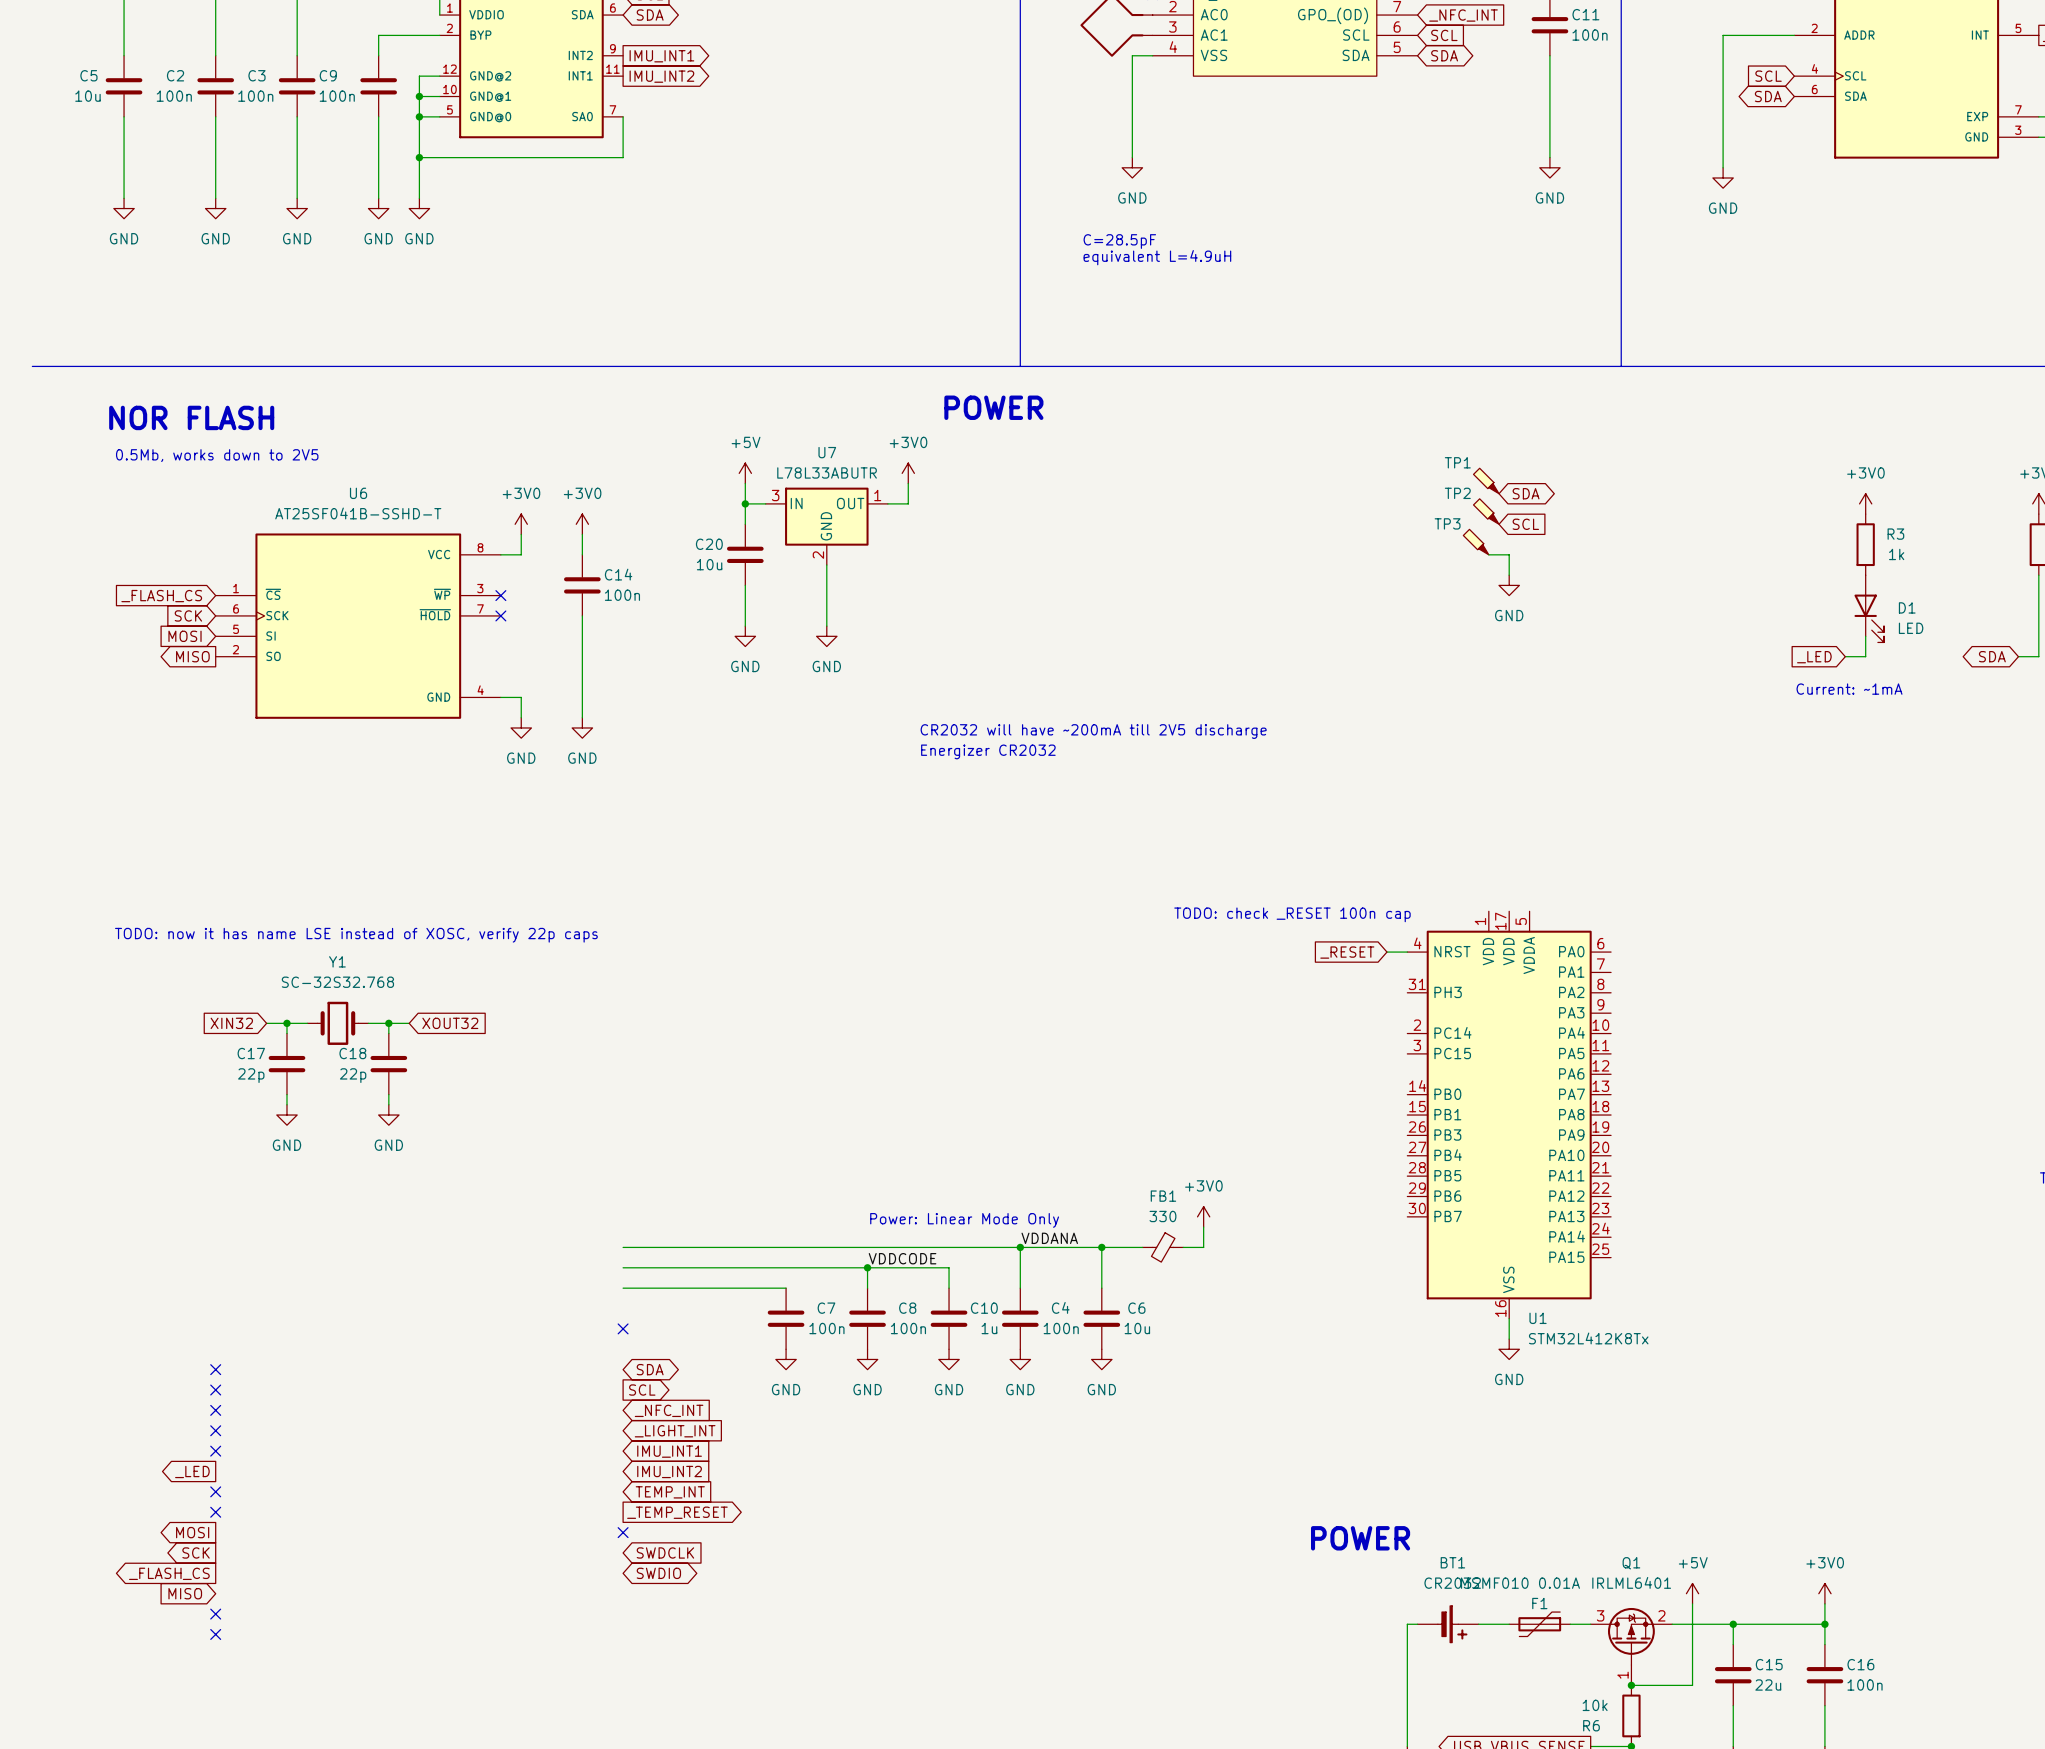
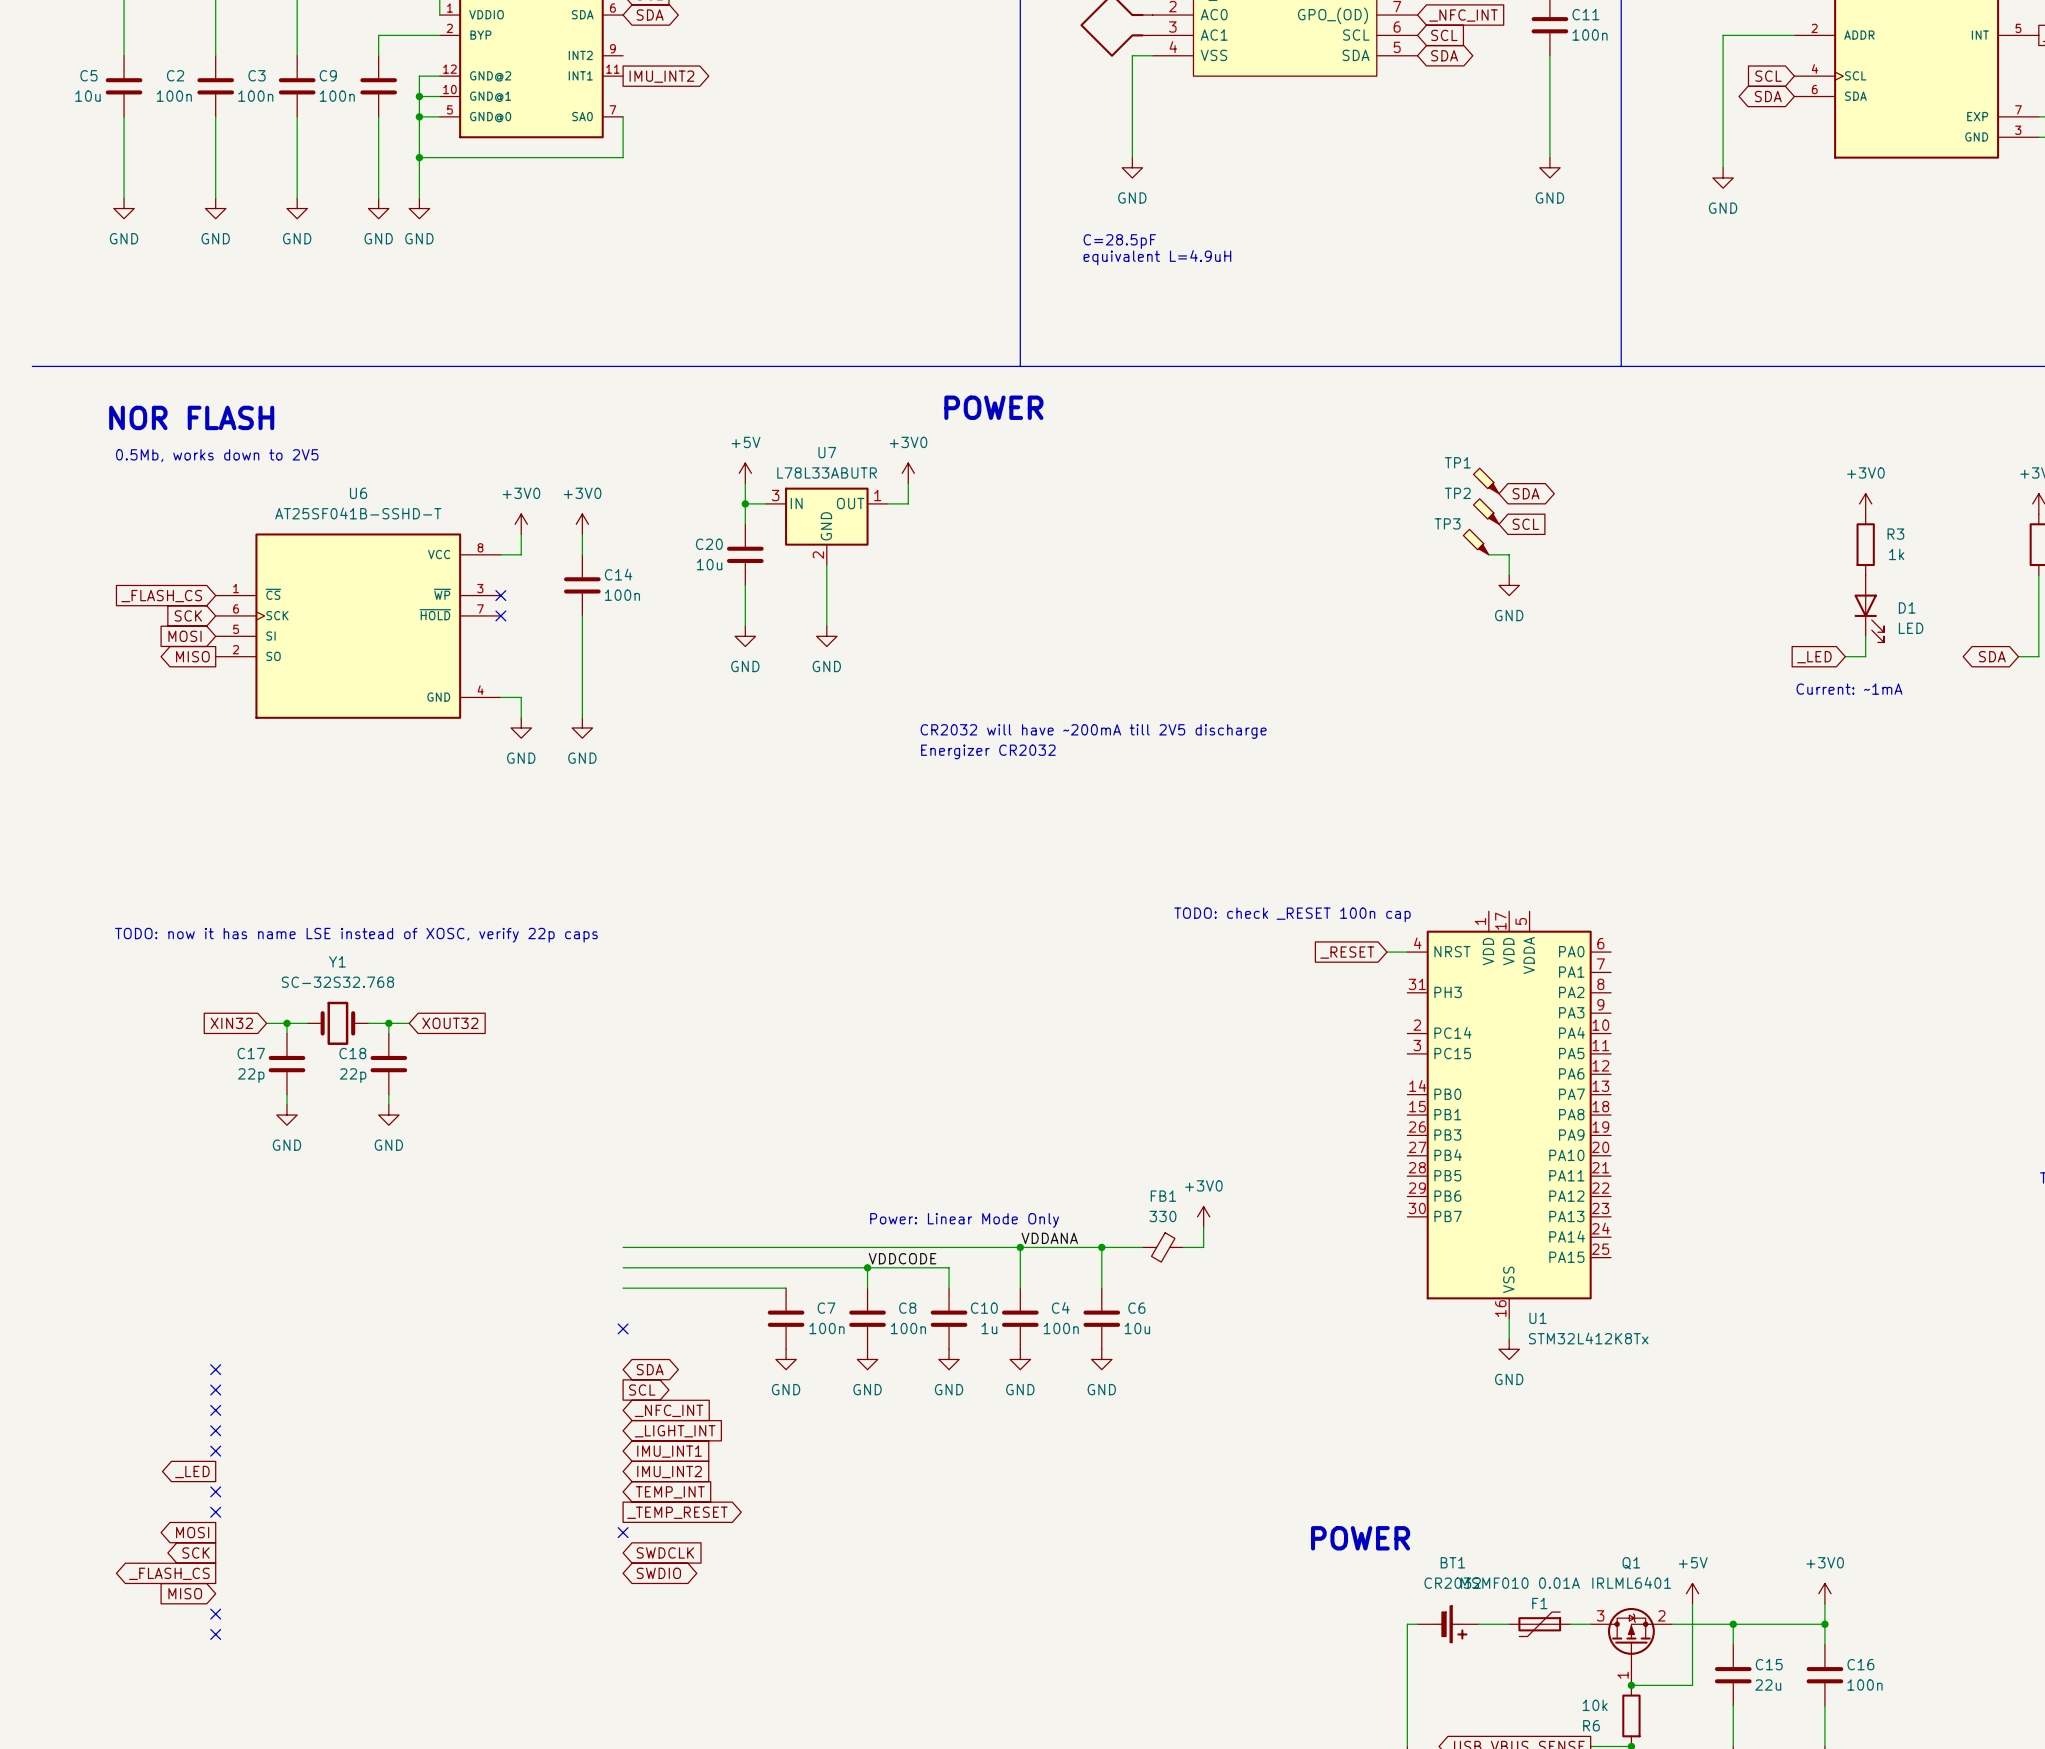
global label: IMU_INT1 (661, 56) -> none

